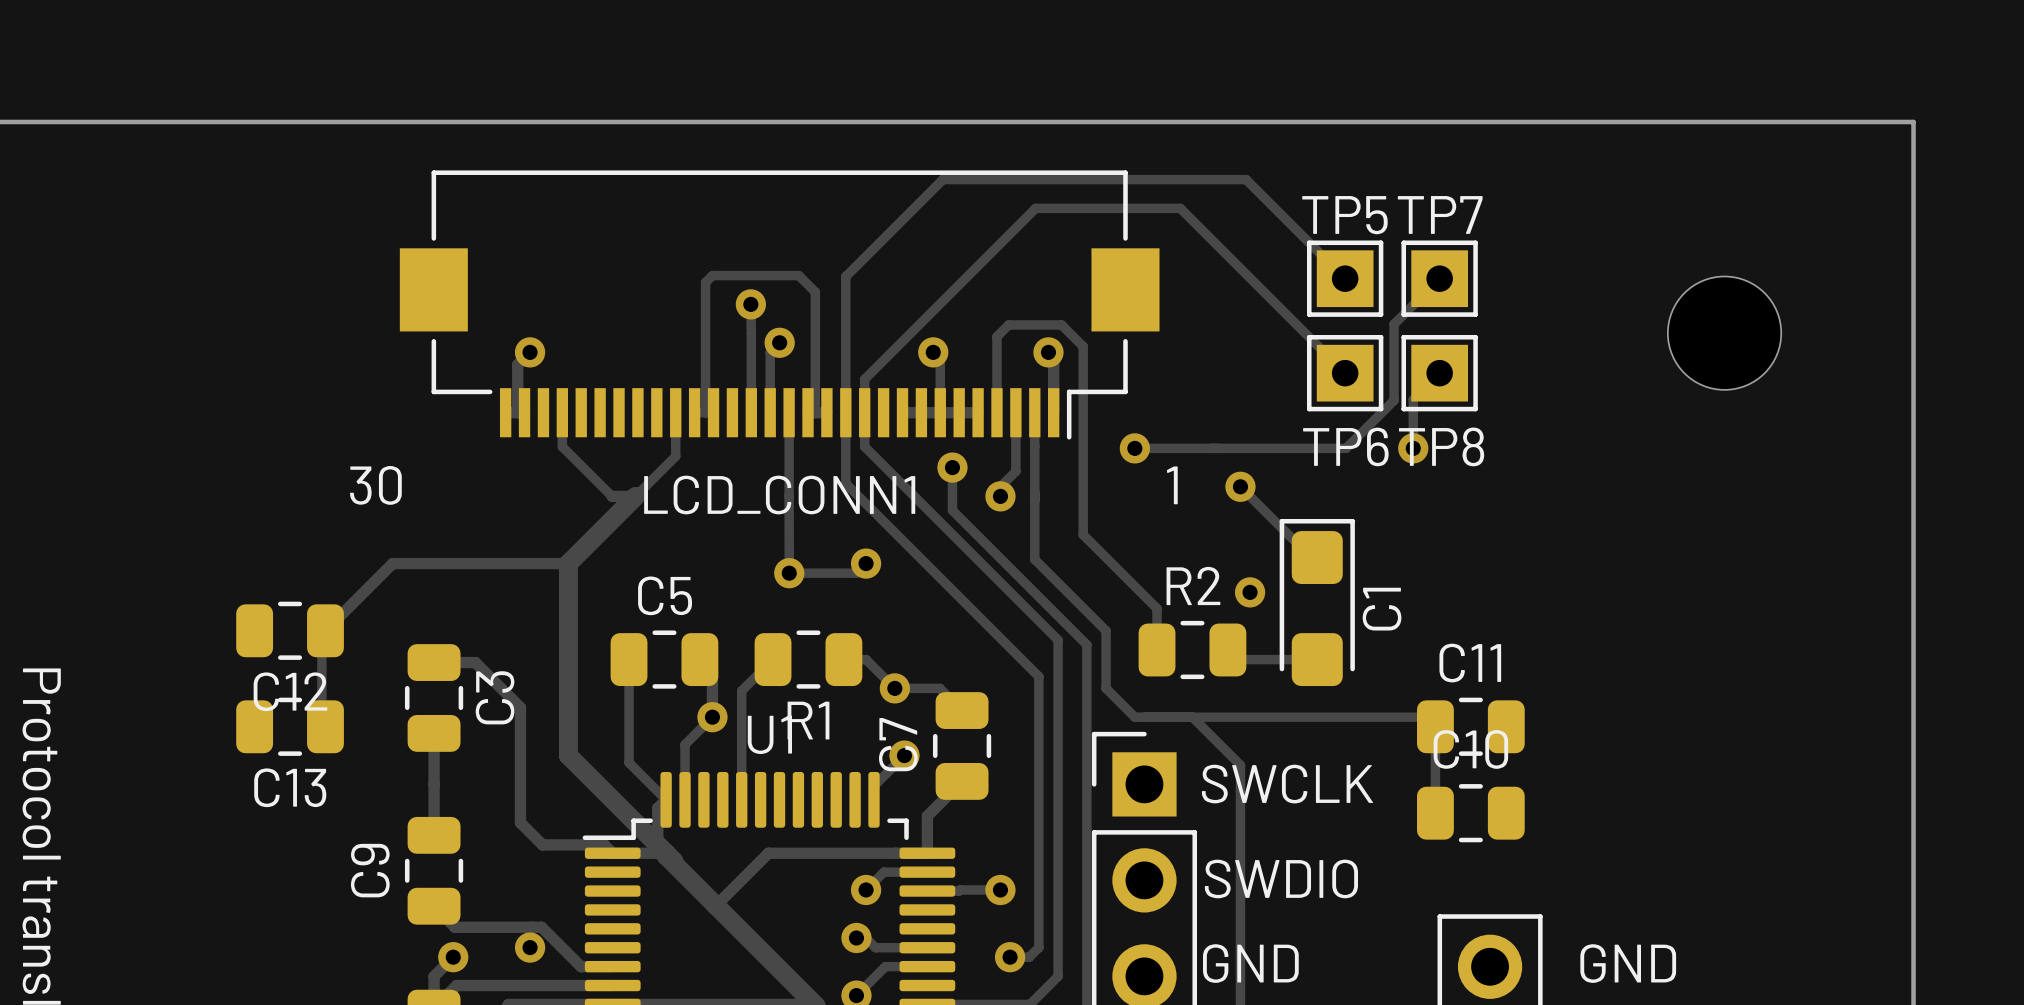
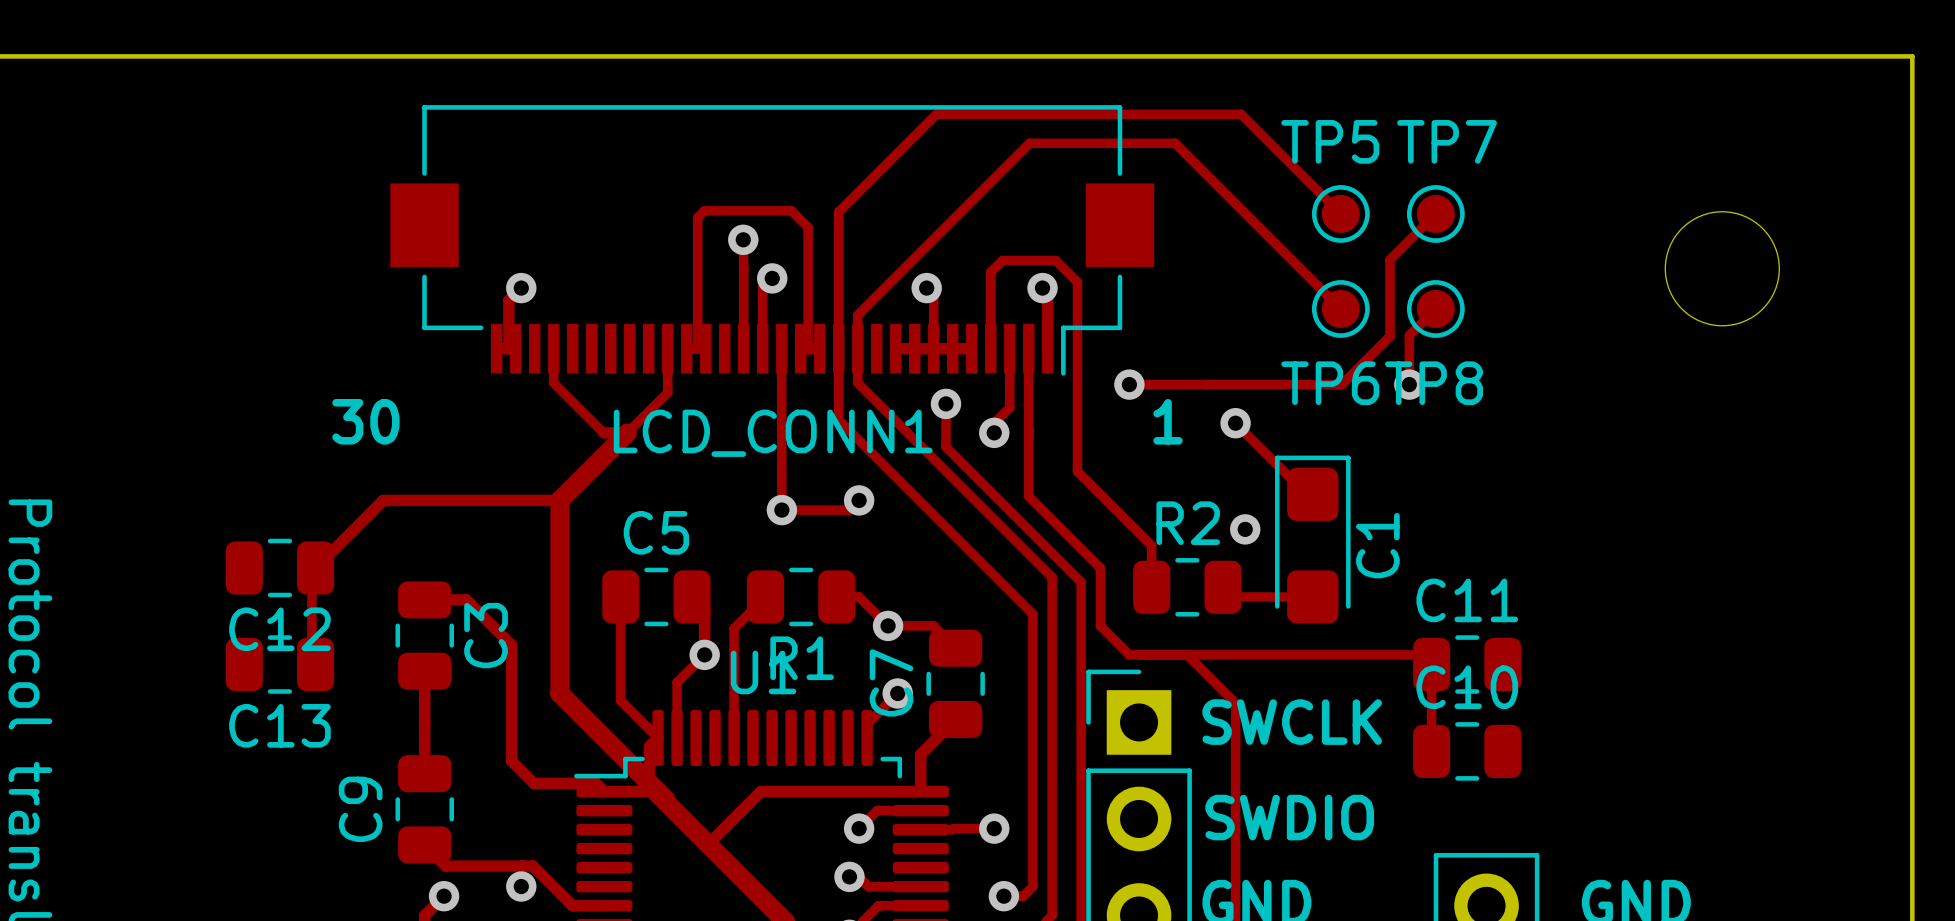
TP5 footprint: [1306, 240, 1384, 317] -> [1311, 185, 1370, 243]
TP7 footprint: [1401, 240, 1478, 317] -> [1406, 185, 1465, 243]
TP6 footprint: [1306, 334, 1384, 412] -> [1311, 280, 1370, 338]
TP8 footprint: [1401, 334, 1478, 412] -> [1406, 280, 1465, 338]

